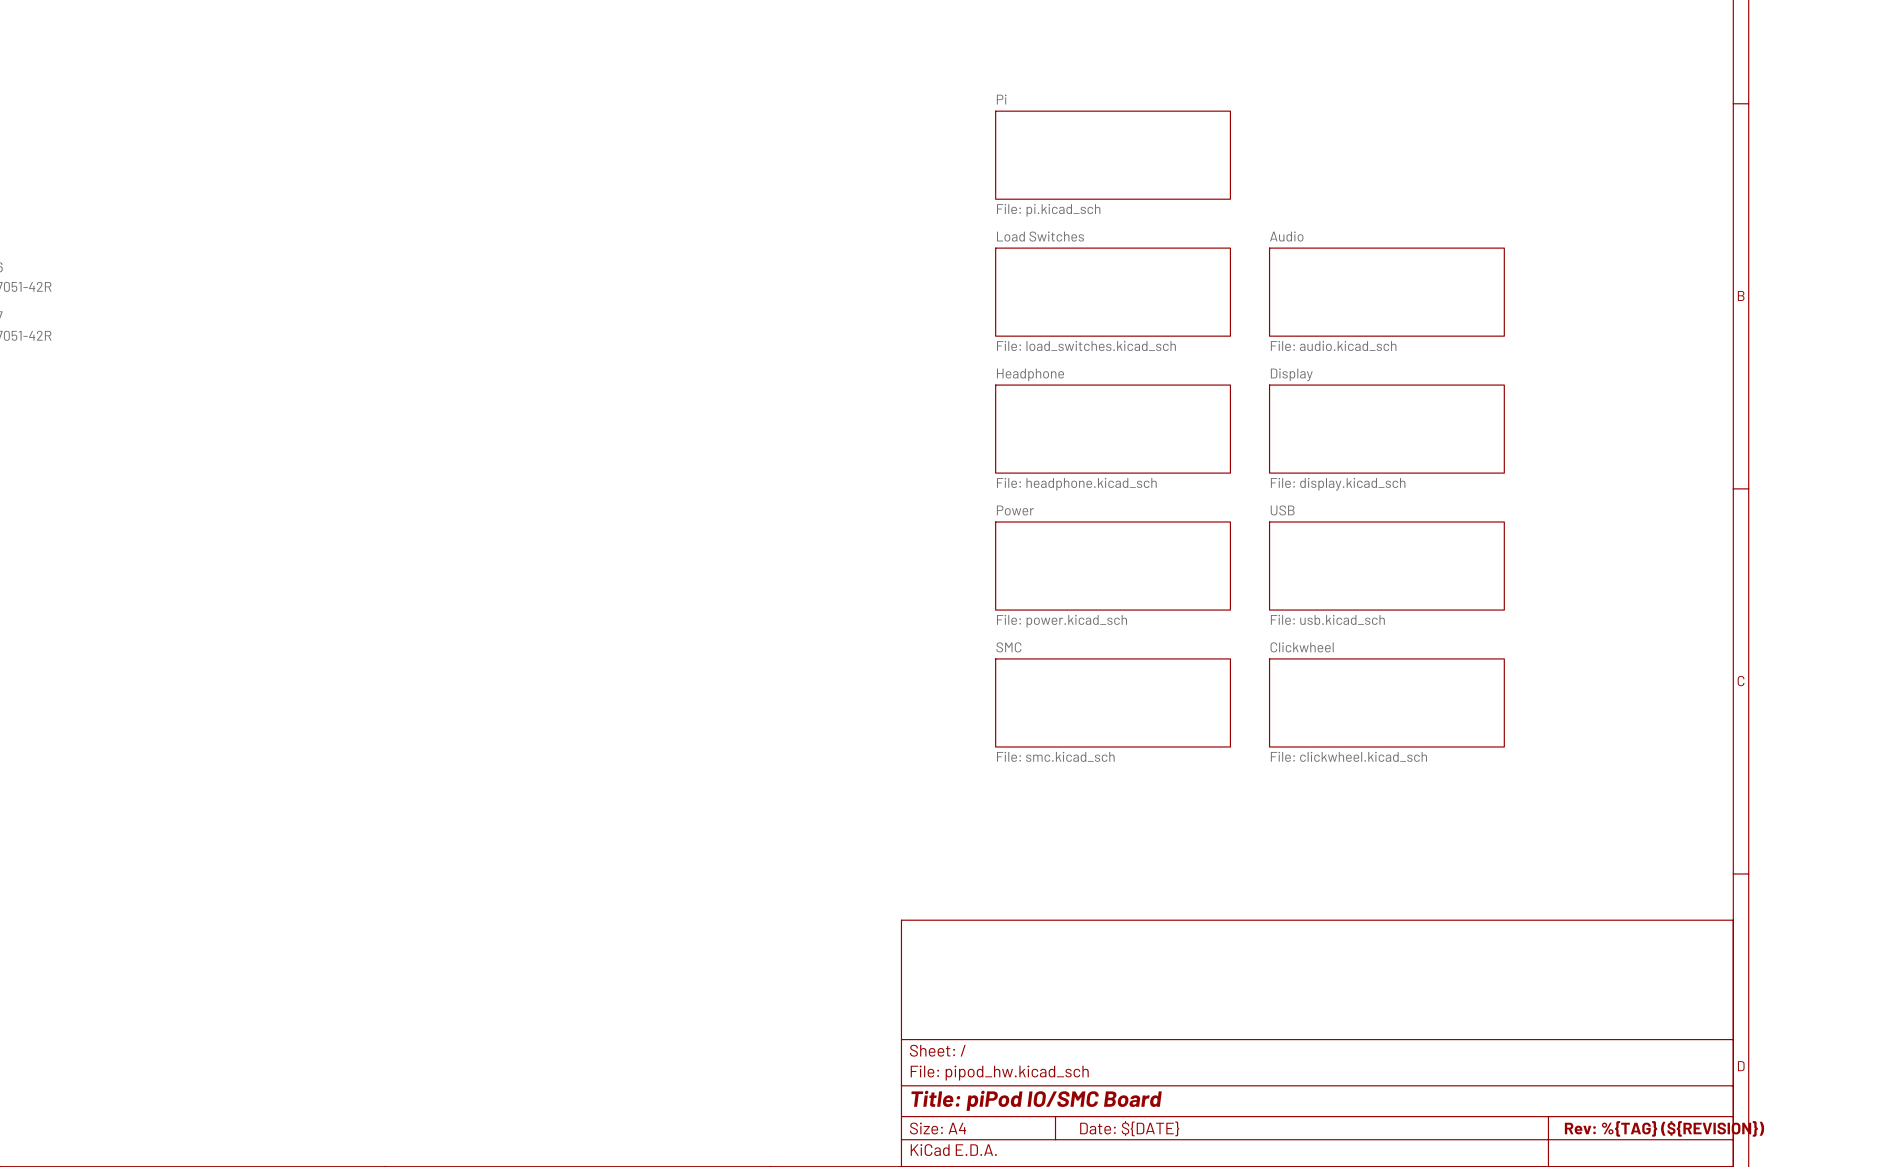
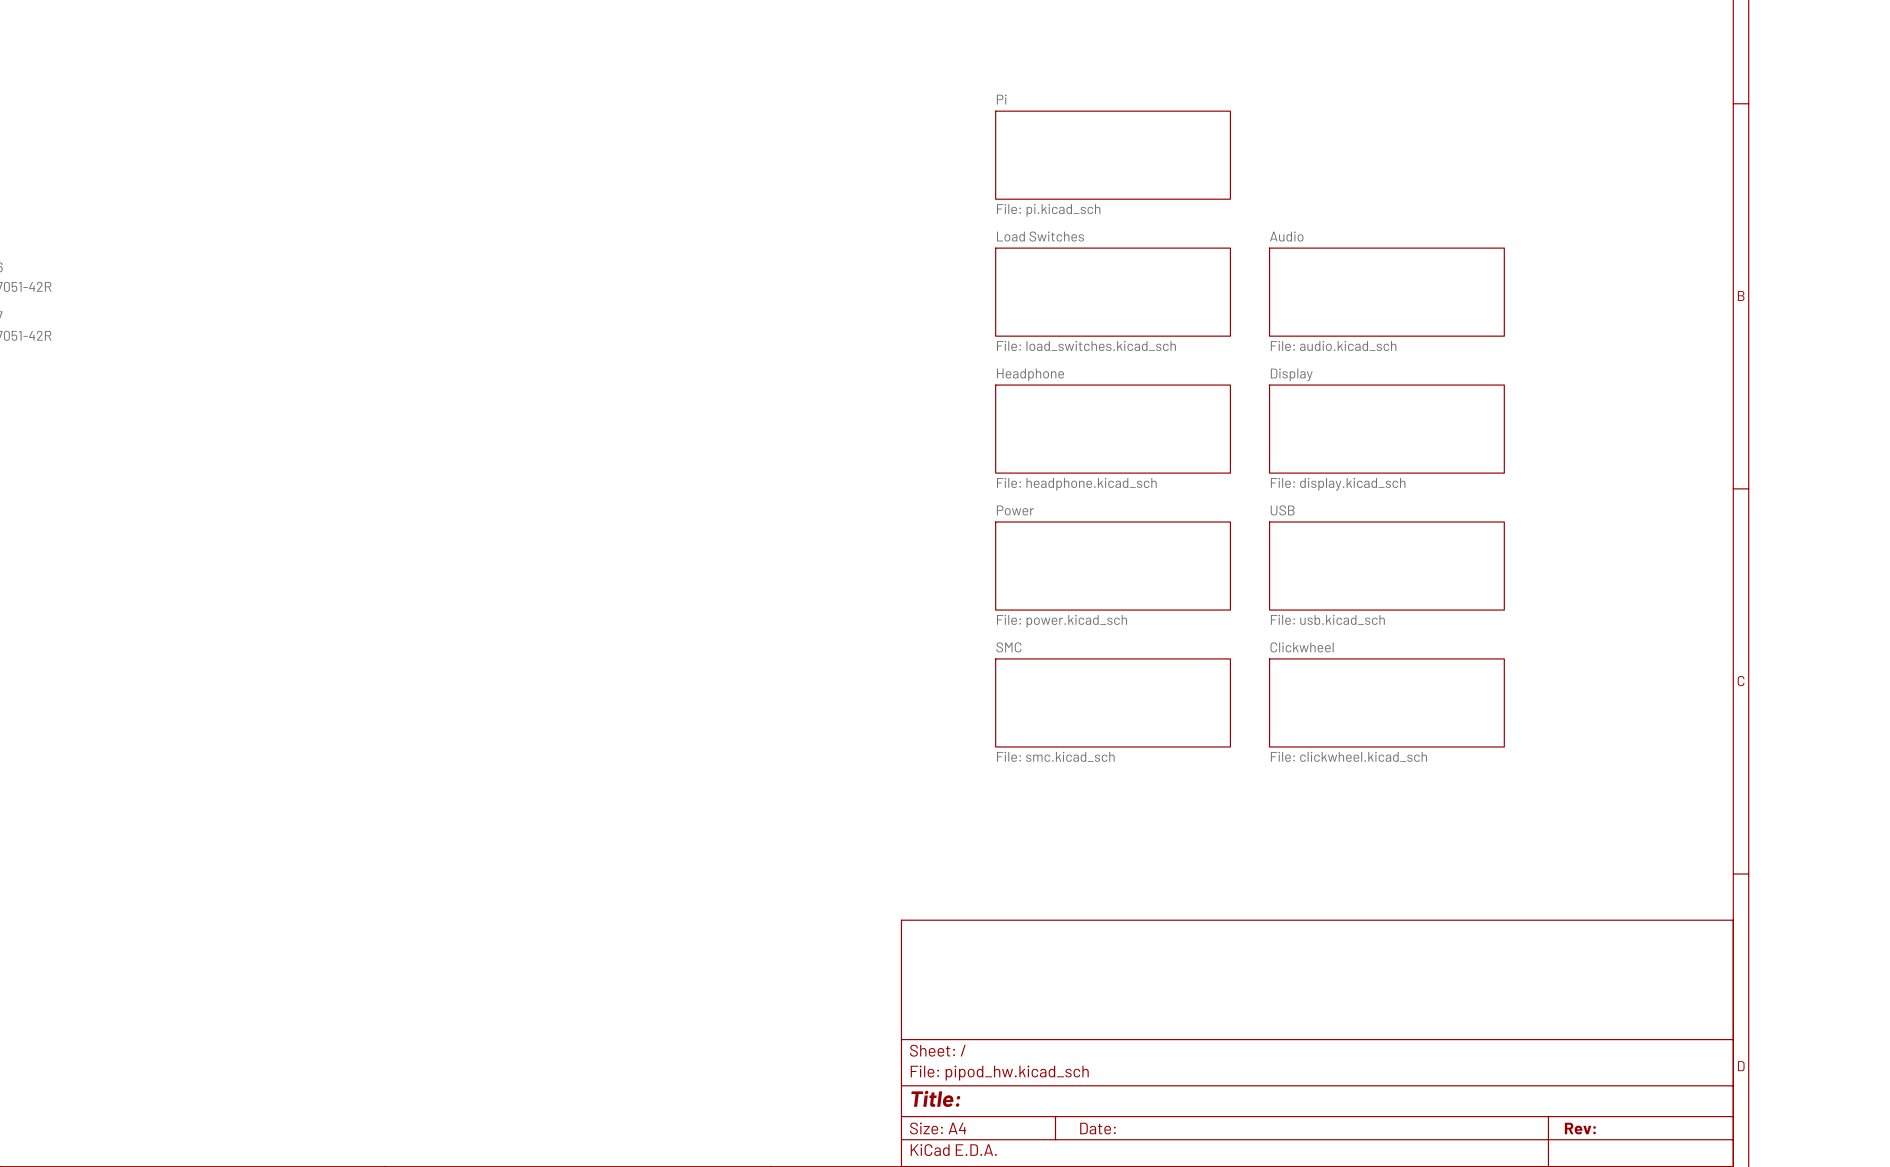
title block: Title: piPod IO/SMC Board (1036, 1100) -> Title: (935, 1098)
title block: Date: ${DATE} (1129, 1128) -> Date: (1097, 1128)
title block: Rev: %{TAG} (${REVISION}) (1664, 1128) -> Rev: (1580, 1128)

